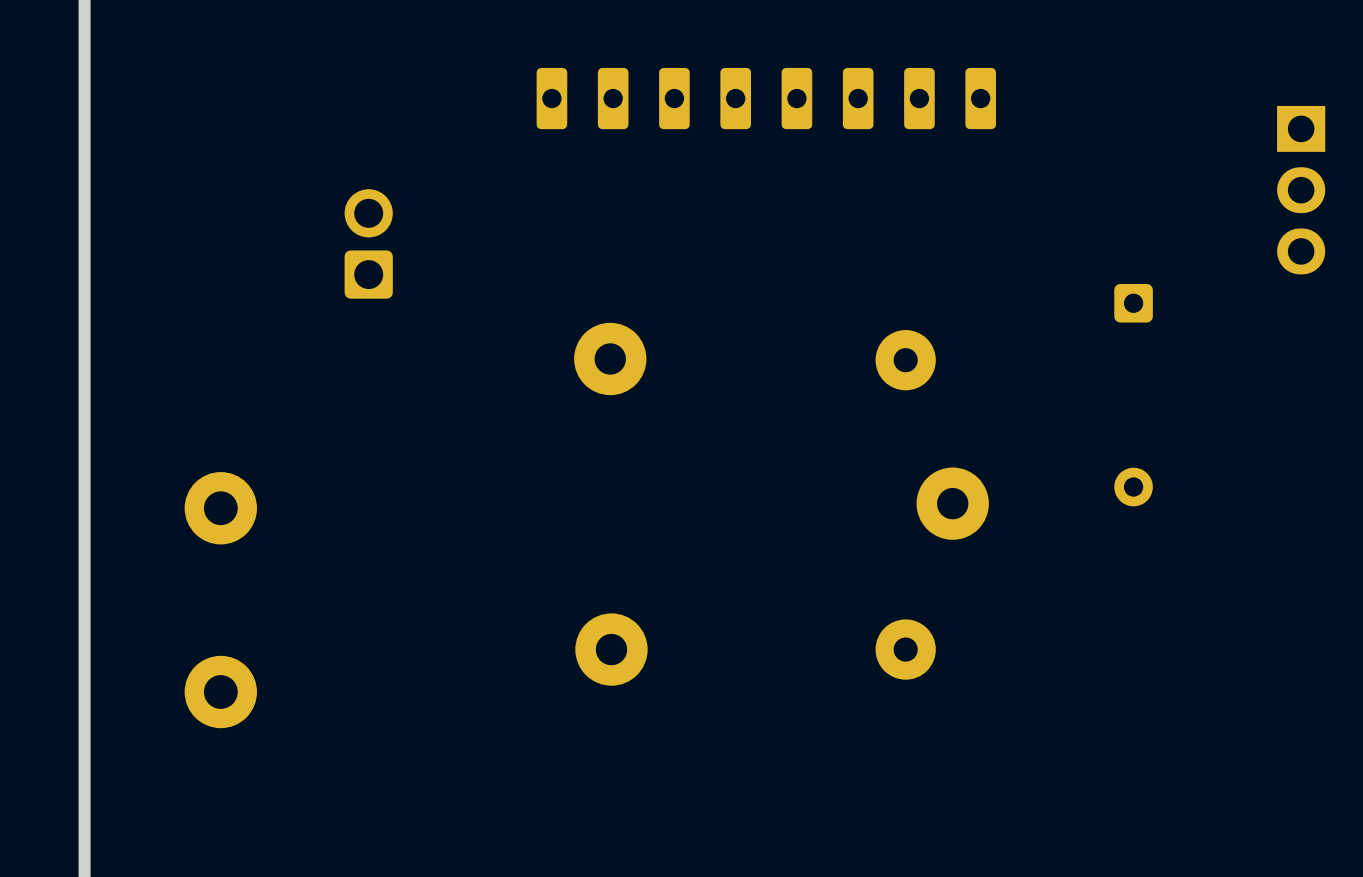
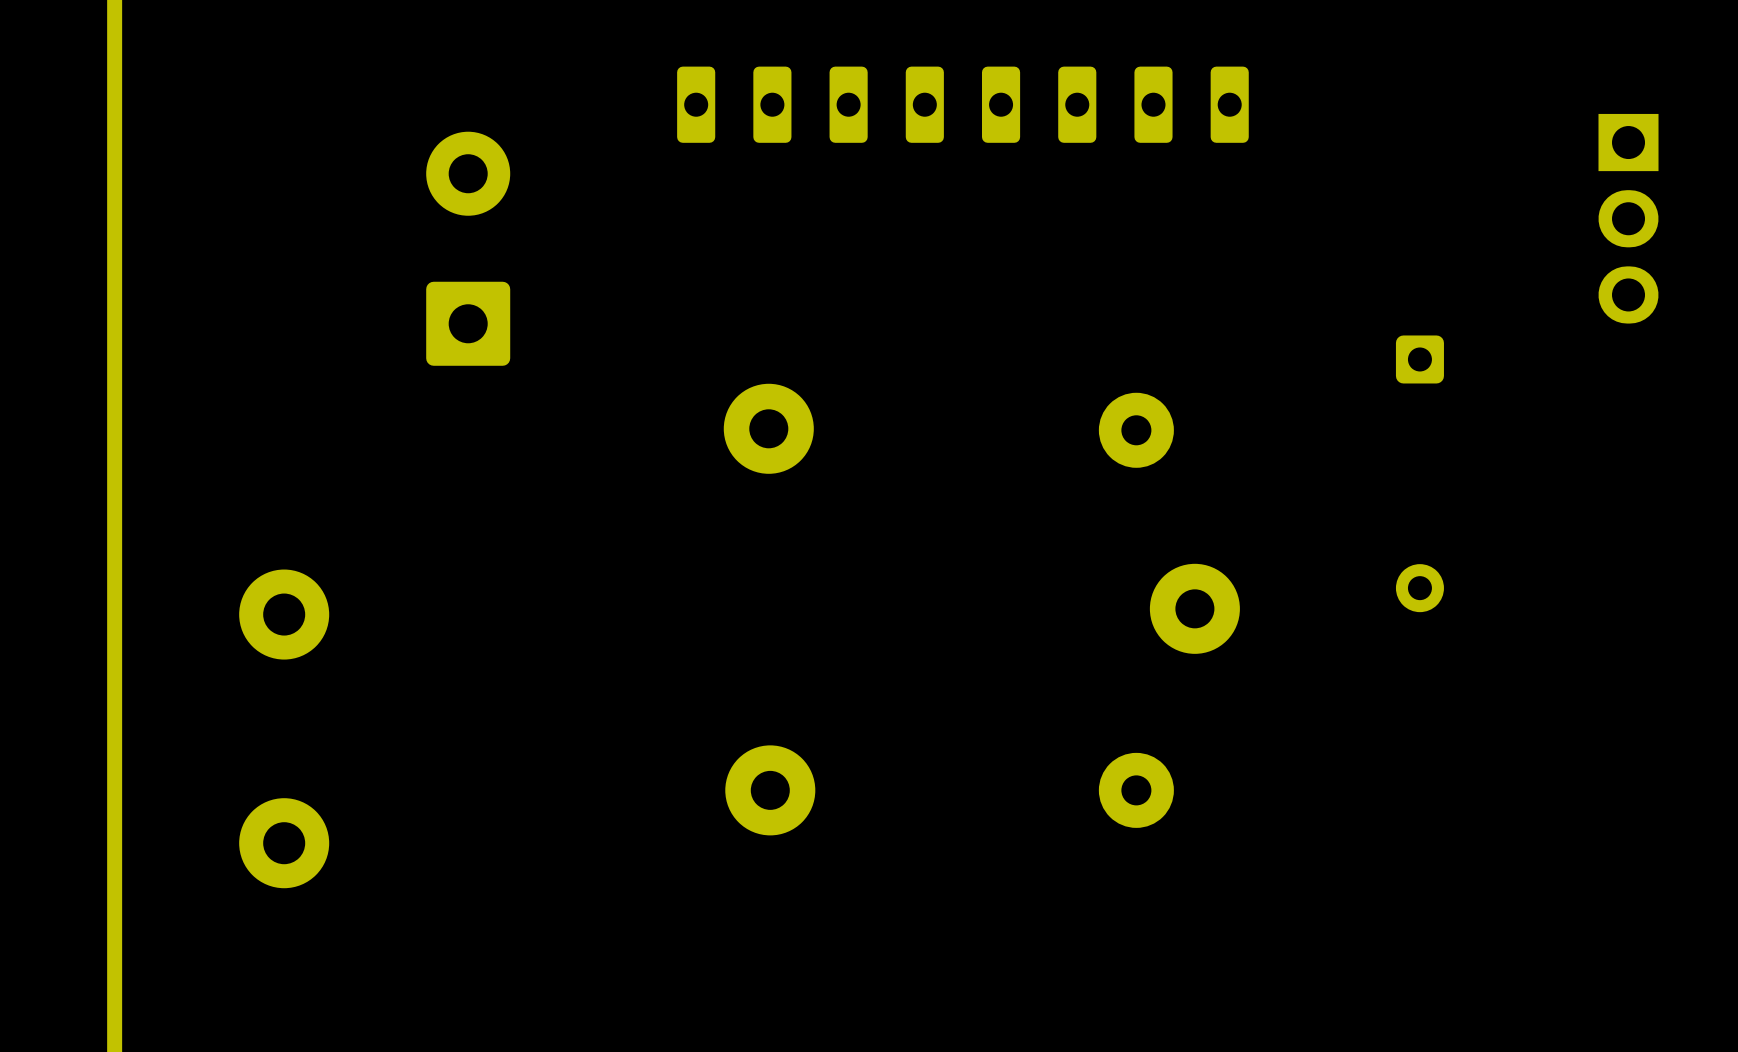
part: none -> (468, 248)
part: (368, 243) -> none

